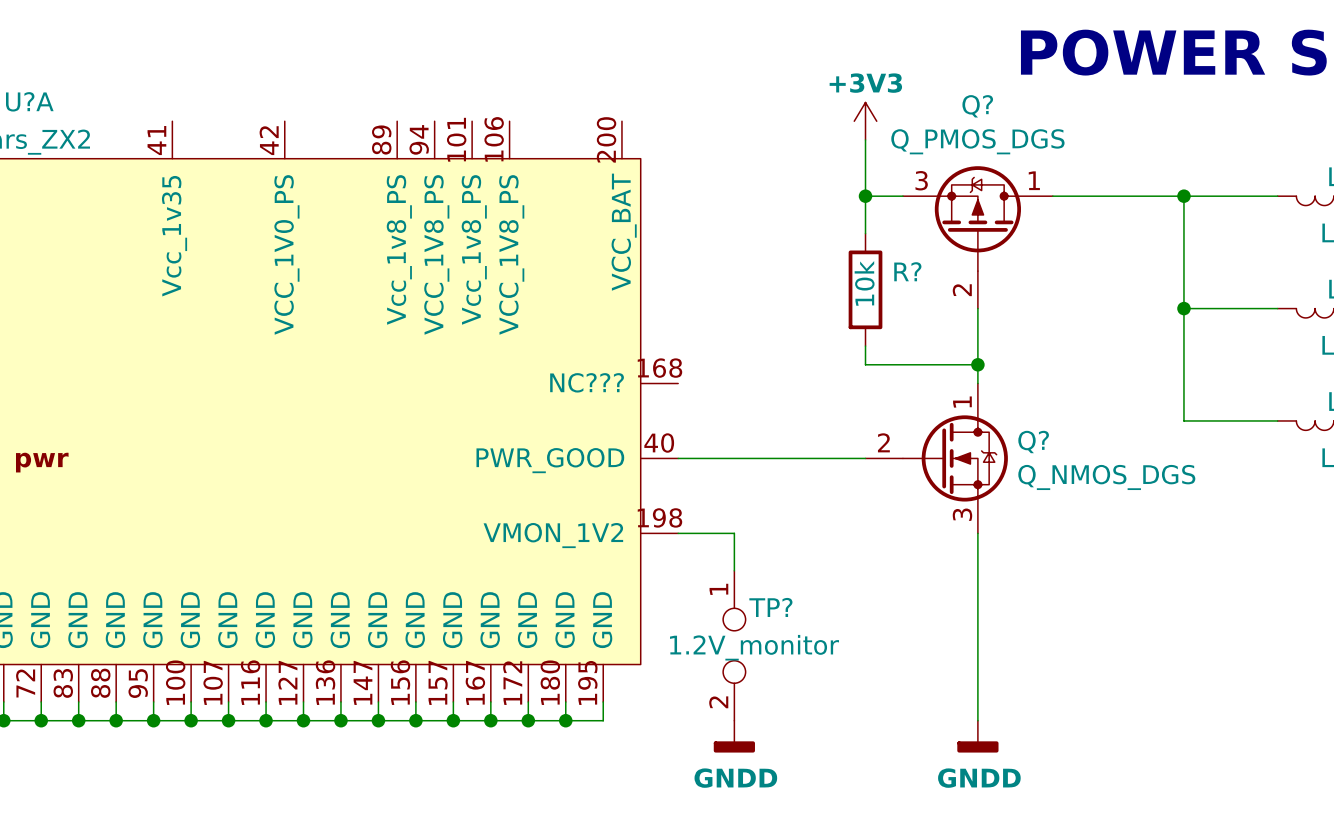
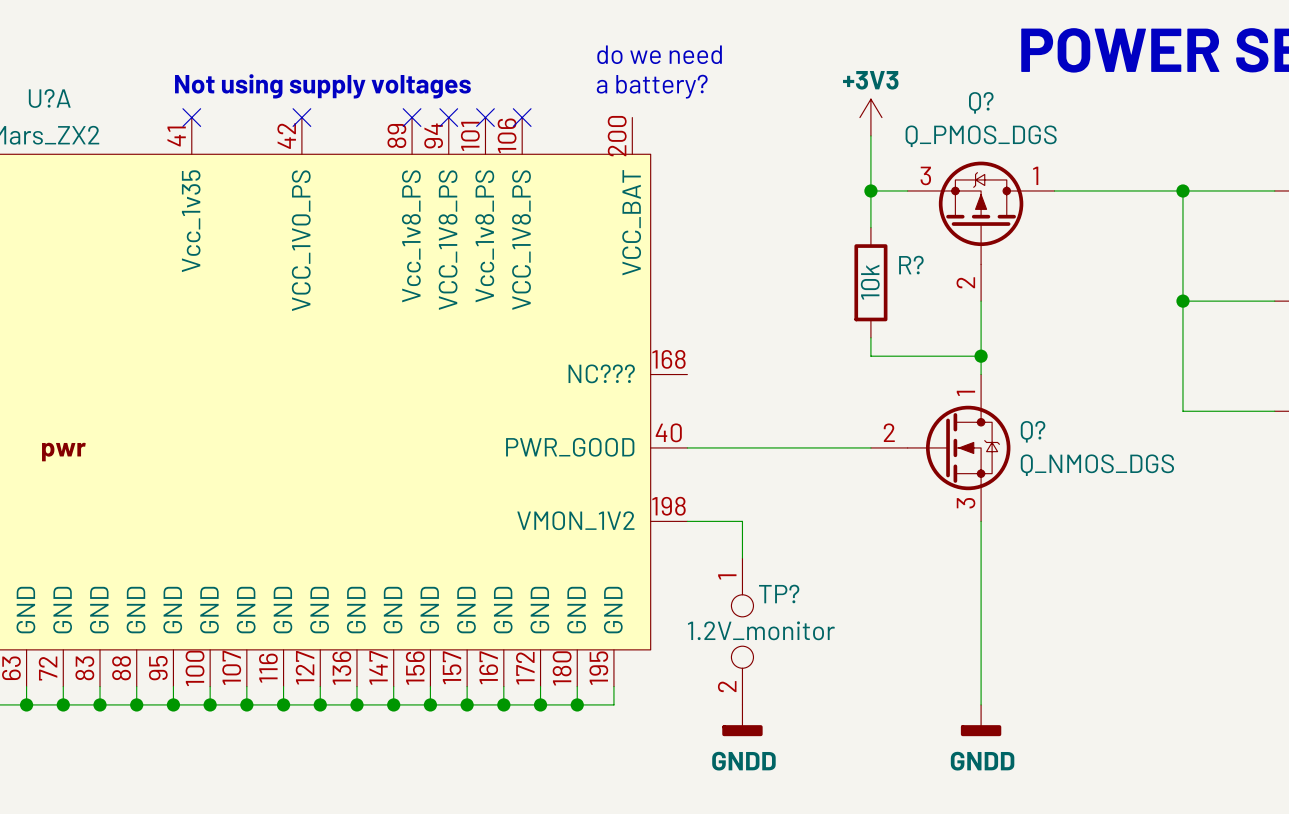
text: none -> do we need (659, 54)
text: none -> Not using supply voltages (322, 86)
text: none -> a battery? (652, 86)
no-connect mark: none -> (191, 117)
no-connect mark: none -> (301, 117)
no-connect mark: none -> (412, 117)
no-connect mark: none -> (448, 117)
no-connect mark: none -> (485, 117)
no-connect mark: none -> (522, 117)

